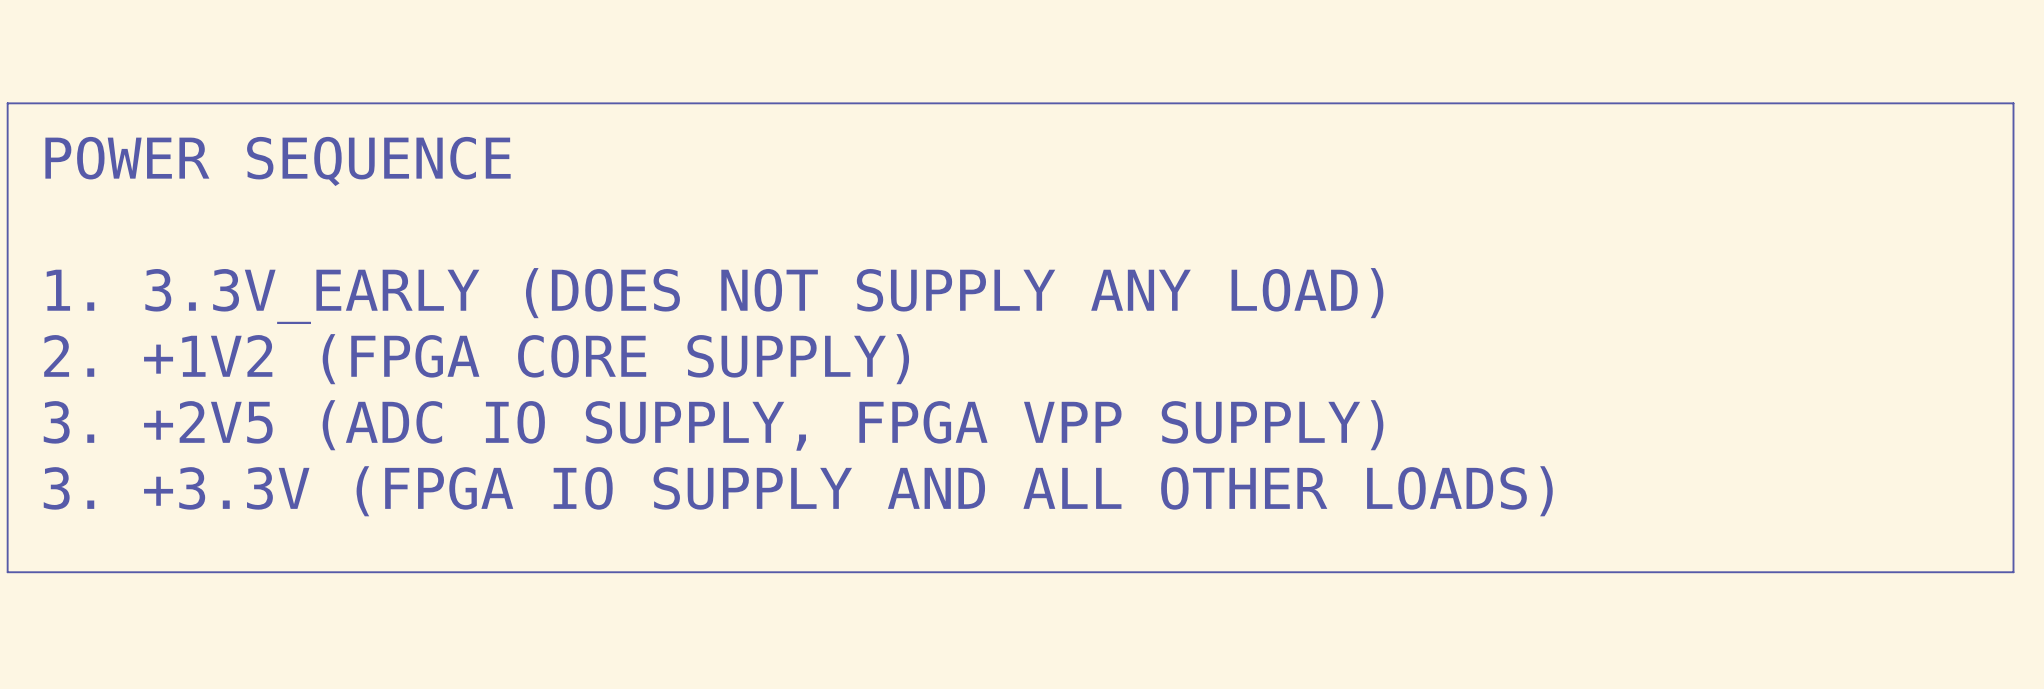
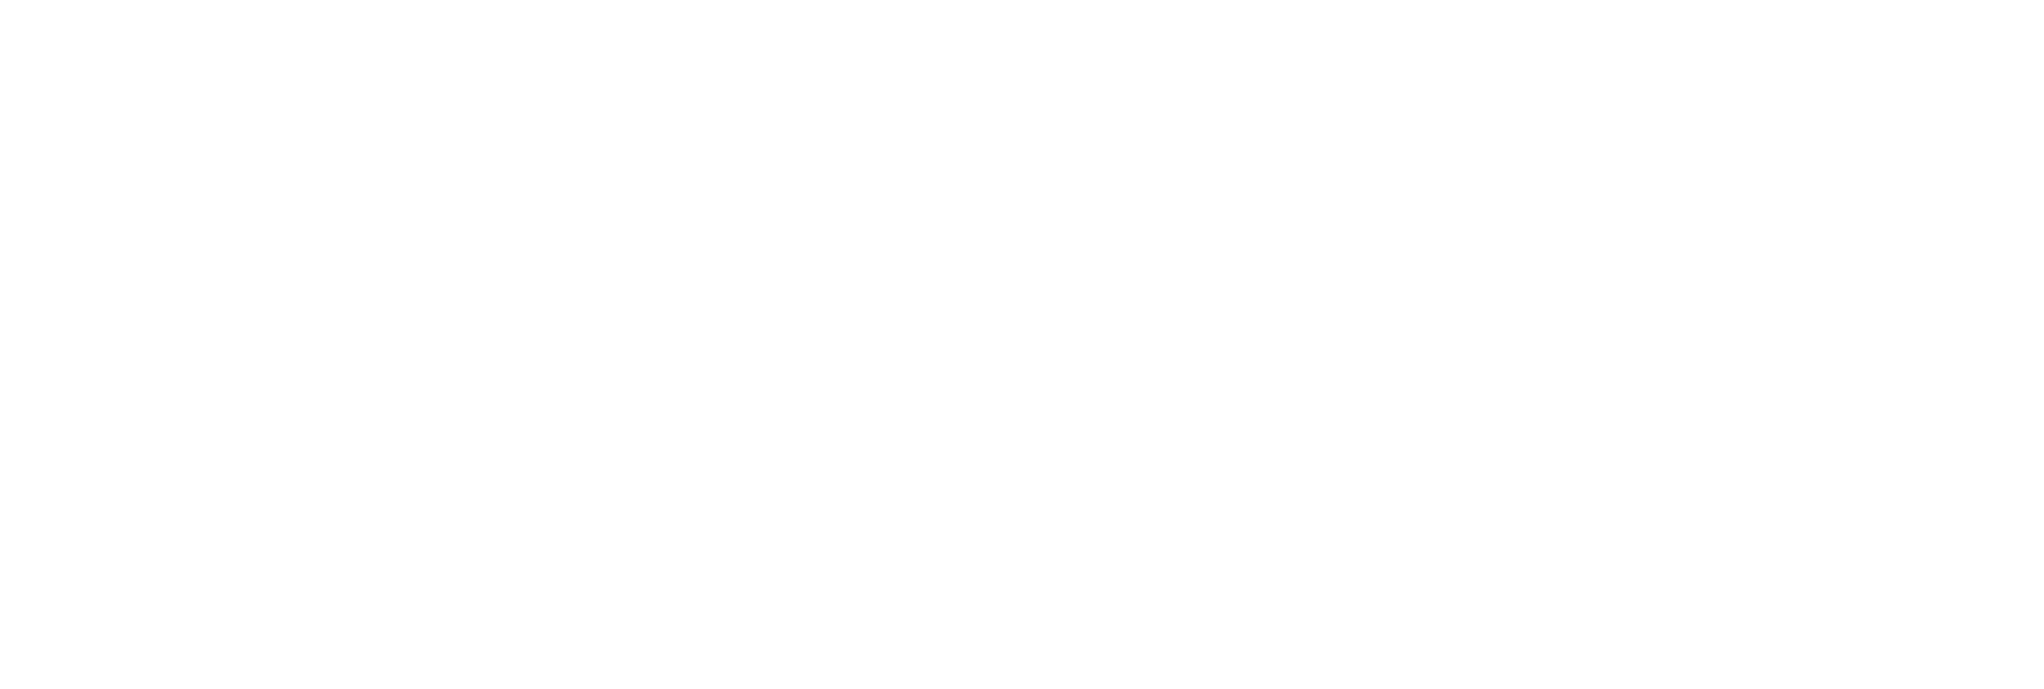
line: (7, 103) (2013, 103) (2013, 572) (7, 572) (7, 103) -> none
text: POWER SEQUENCE (278, 161) -> none
text: 1. 3.3V_EARLY (DOES NOT SUPPLY ANY LOAD) (715, 296) -> none
text: 2. +1V2 (FPGA CORE SUPPLY) (476, 359) -> none
text: 3. +2V5 (ADC IO SUPPLY, FPGA VPP SUPPLY) (713, 425) -> none
text: 3. +3.3V (FPGA IO SUPPLY AND ALL OTHER LOADS) (798, 491) -> none

